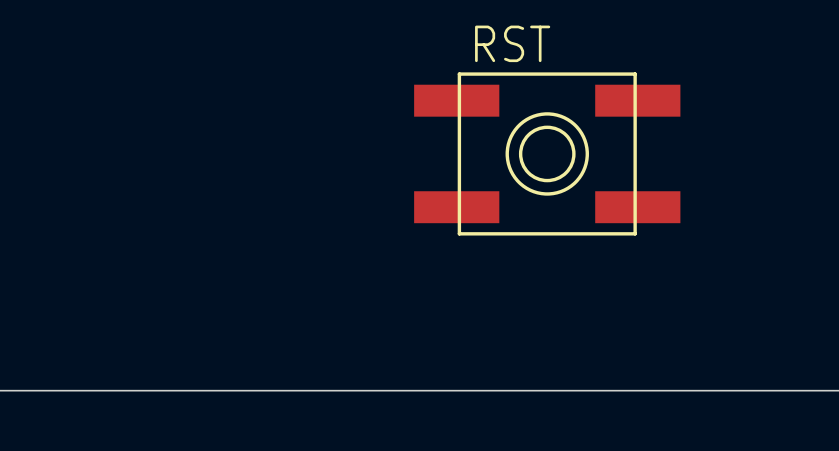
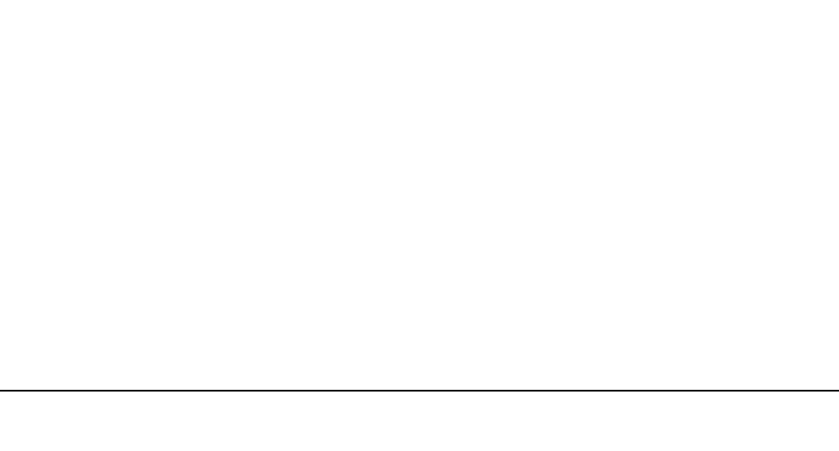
RST: (547, 153) -> none

